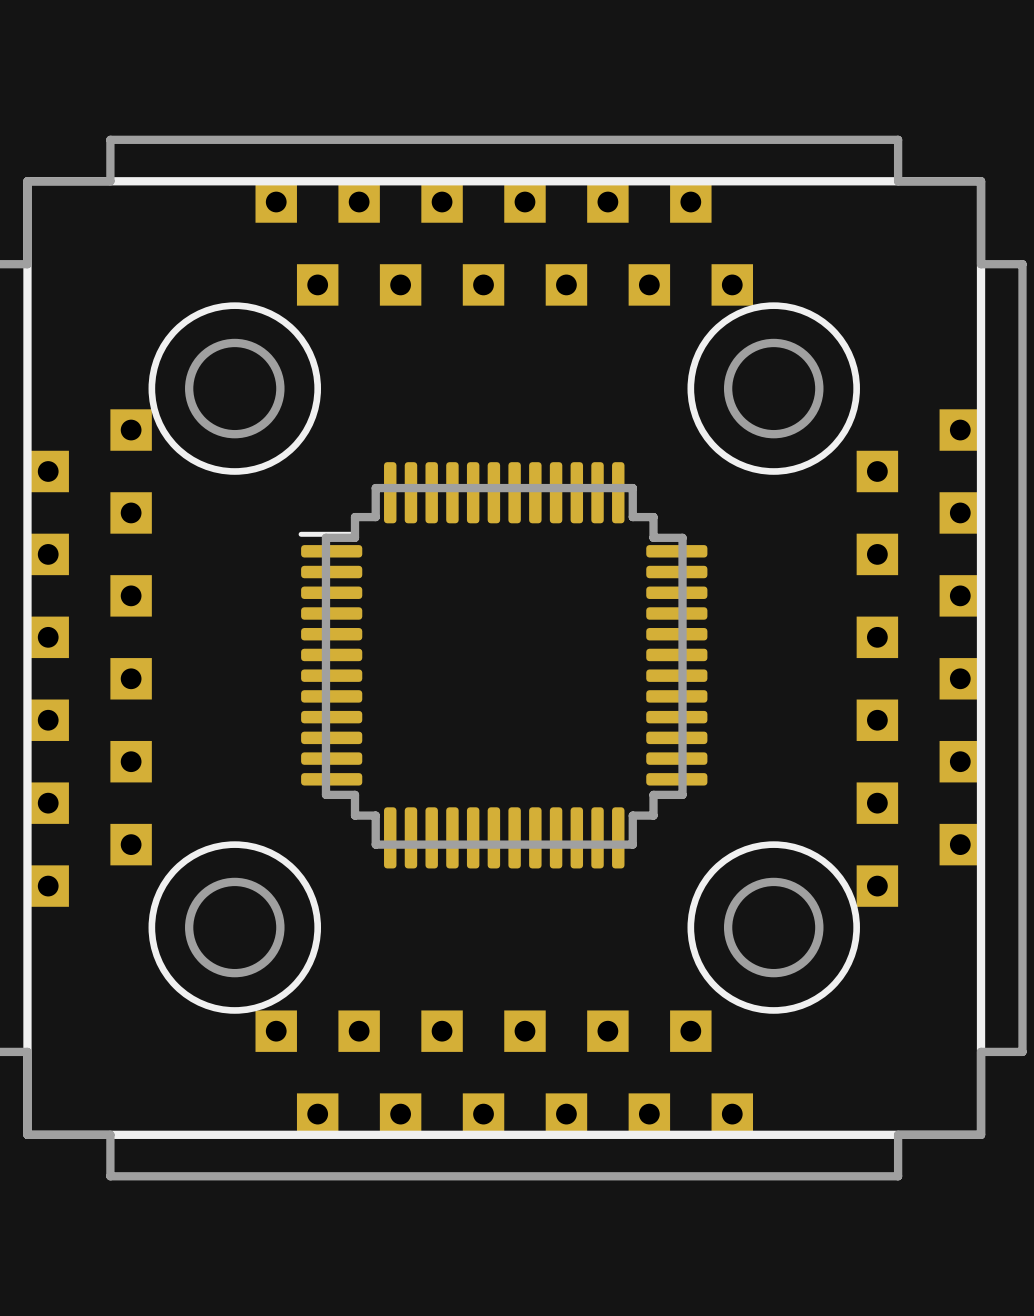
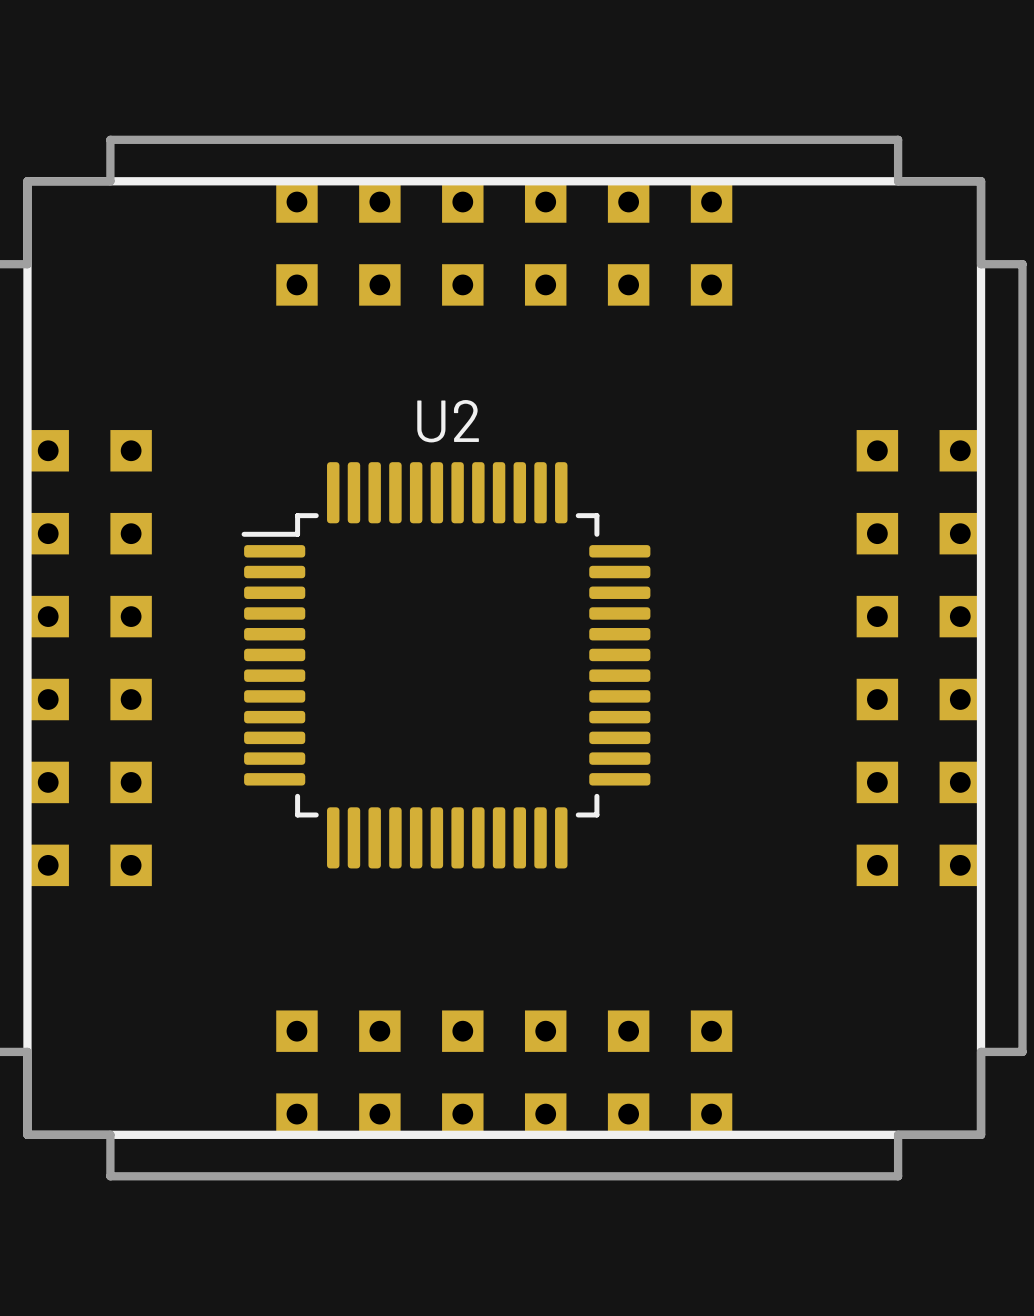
part footprint: [255, 181, 754, 306] -> [276, 181, 733, 306]
drawing: [148, 302, 322, 475] -> none
drawing: [687, 302, 860, 475] -> none
round board edge: [185, 338, 285, 439] -> none
round board edge: [723, 338, 824, 439] -> none
part footprint: [27, 409, 152, 907] -> [27, 430, 152, 887]
part footprint: [856, 409, 982, 907] -> [856, 430, 982, 887]
board edge: (375, 488) (375, 517) (355, 517) (355, 537) (325, 537) (325, 794) (355, 794) (355, 815) (375, 815) (375, 844) (632, 844) (632, 815) (653, 815) (653, 794) (682, 794) (682, 537) (653, 537) (653, 517) (632, 517) (632, 488) (375, 488) -> none
U2: none -> (446, 665)
part: (503, 665) -> none
drawing: [148, 841, 322, 1014] -> none
drawing: [687, 841, 860, 1014] -> none
round board edge: [185, 877, 285, 978] -> none
round board edge: [723, 877, 824, 978] -> none
part footprint: [255, 1010, 754, 1135] -> [276, 1010, 733, 1135]

